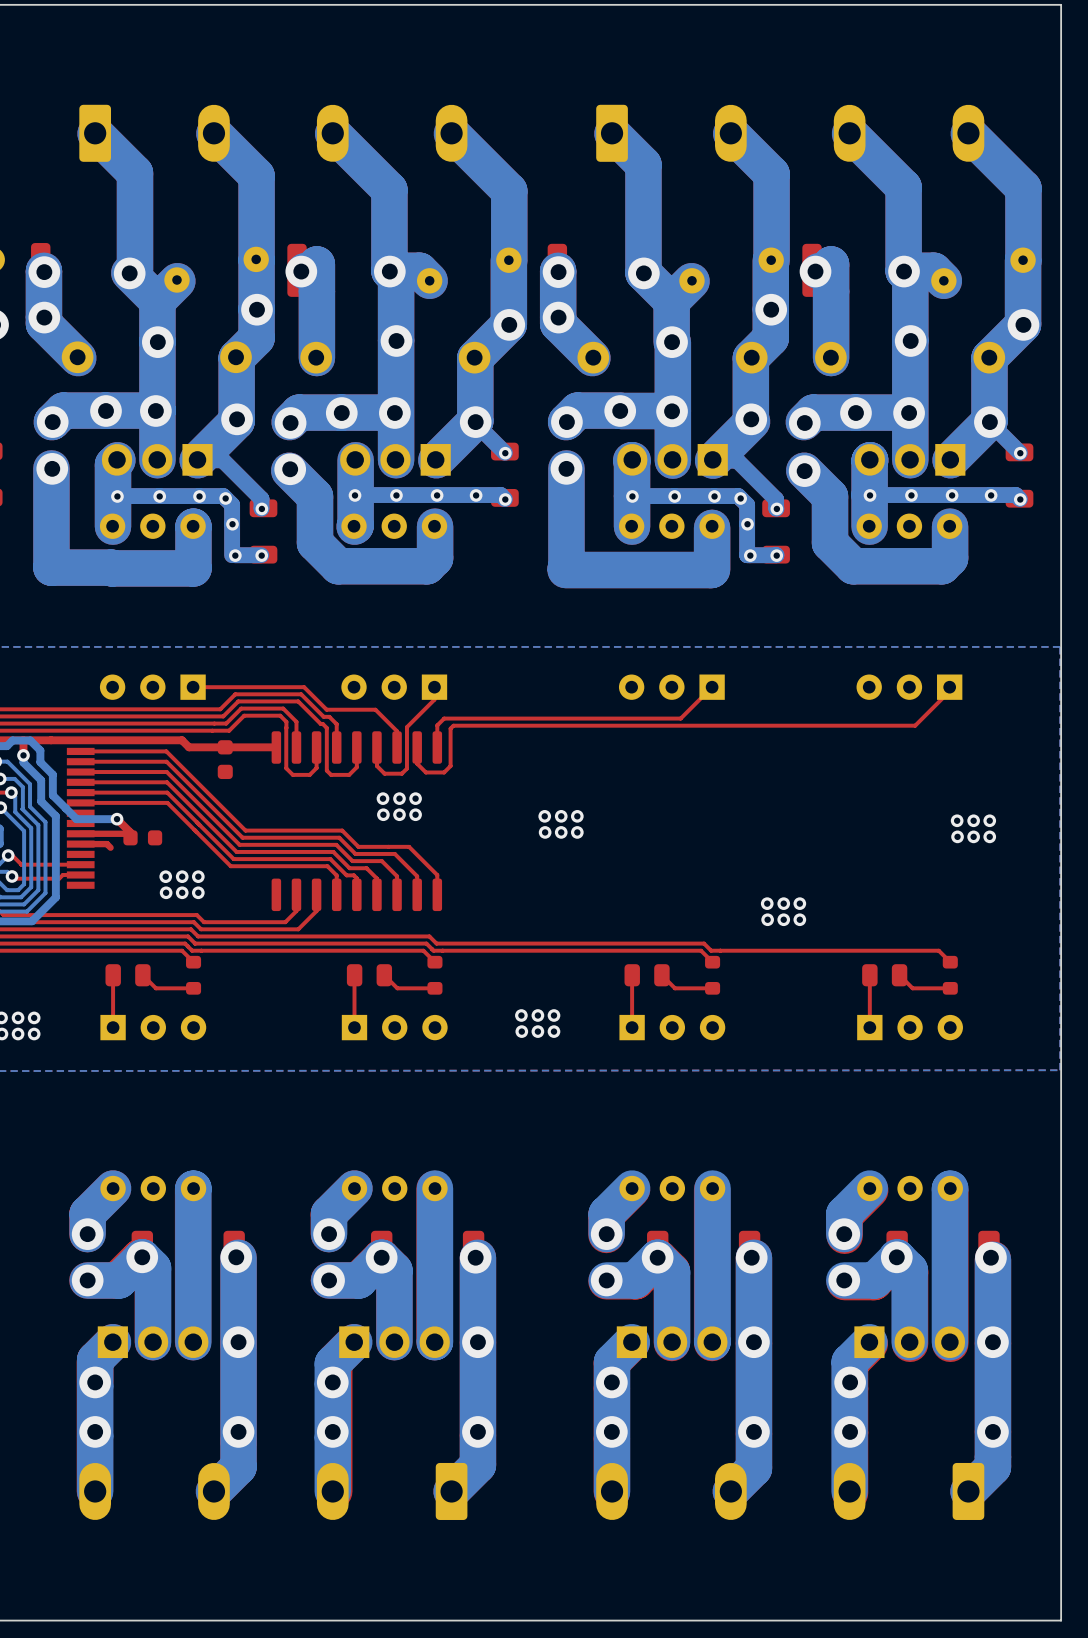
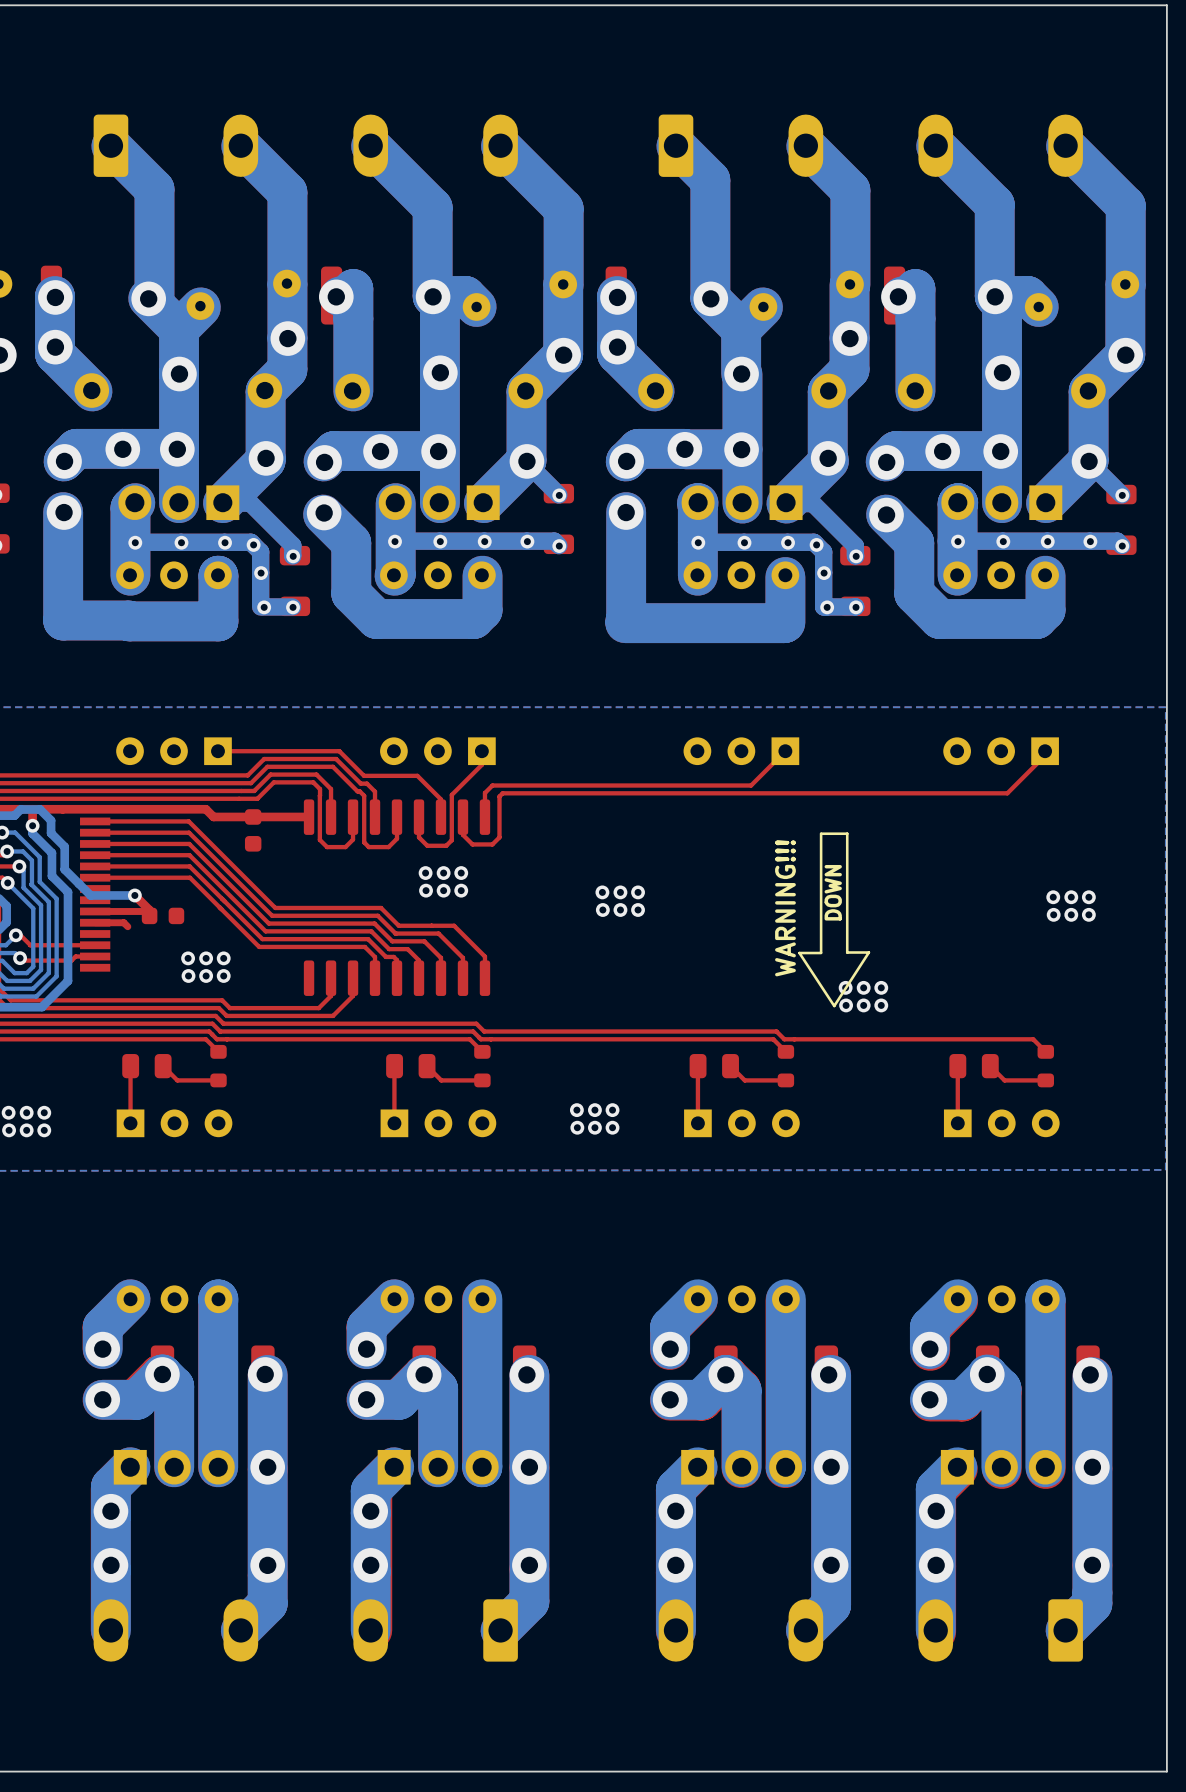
line: none -> (821, 833) (847, 833) (847, 952) (868, 952) (834, 1006) (799, 953) (821, 953)
line: none -> (821, 833) (821, 952)
text: none -> DOWN (833, 892)
text: none -> WARNING!!! (785, 908)

